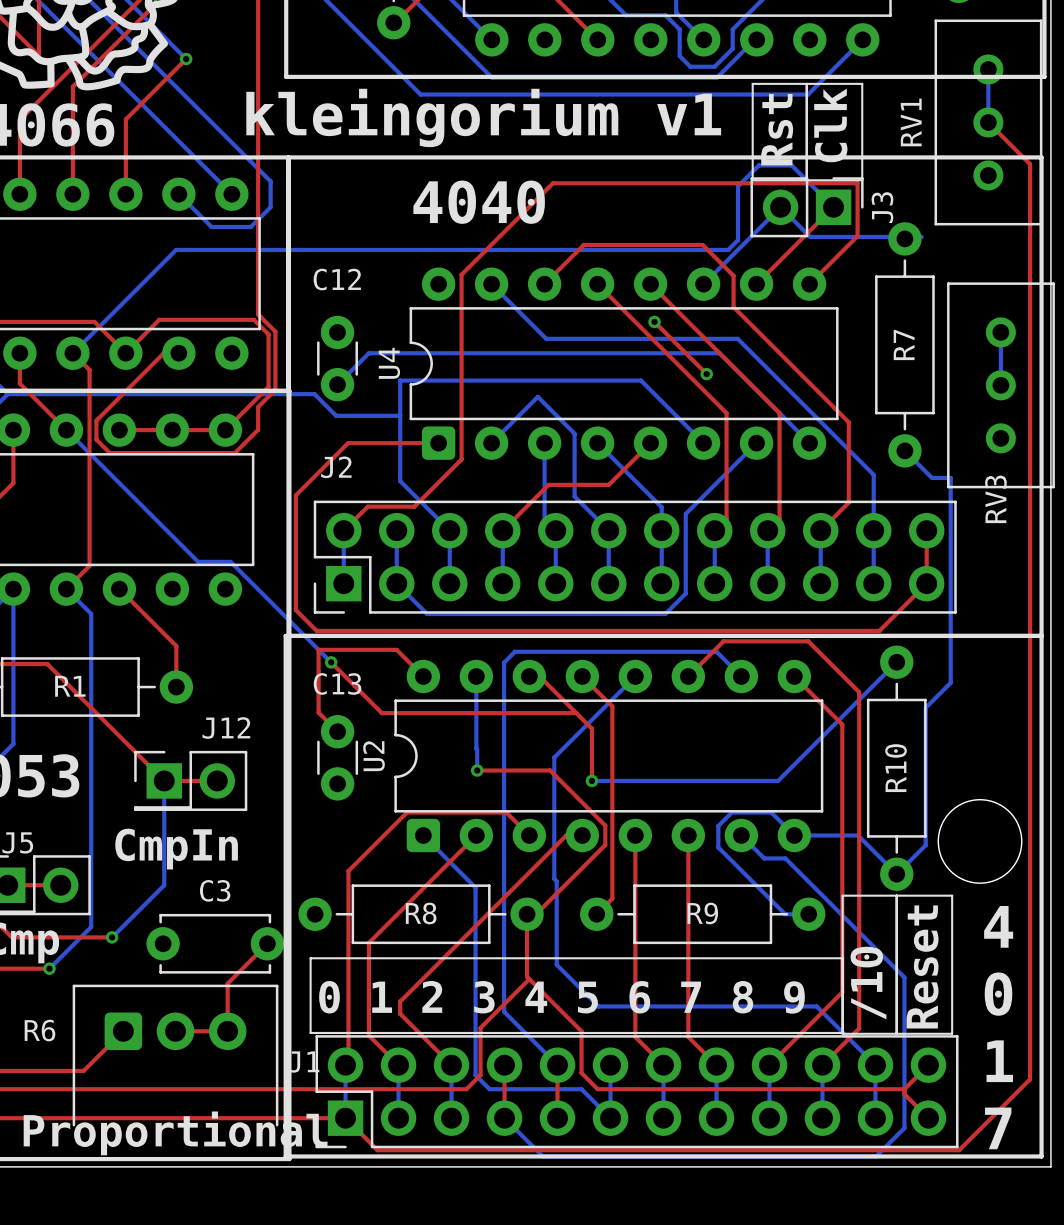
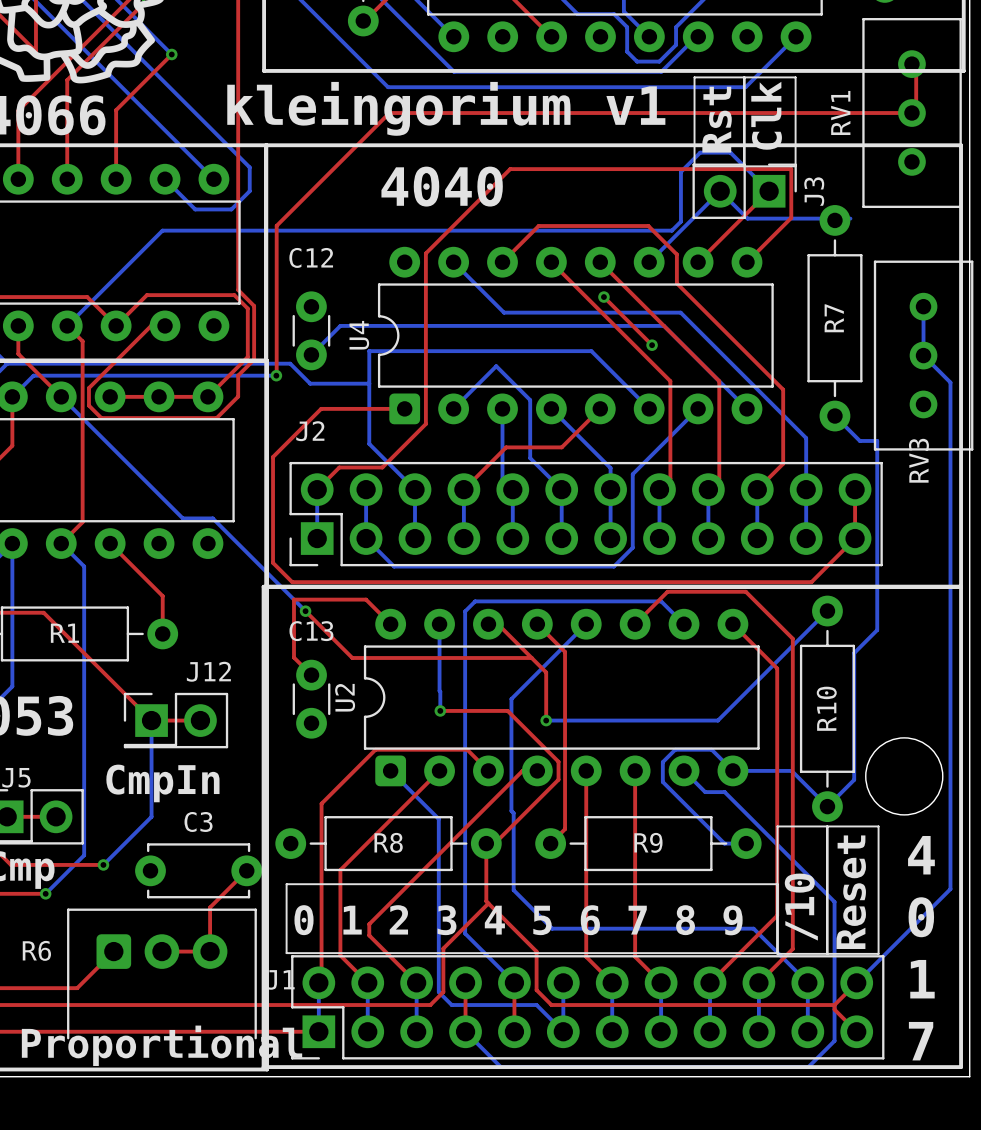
bottom track: (988, 69) (988, 122) -> none
top track: none -> (916, 63) (916, 112)
top track: (988, 122) (1030, 164) (1030, 1079) (959, 1150) (377, 1150) (345, 1118) -> (911, 113) (389, 113) (276, 225) (276, 375)
bottom track: none -> (923, 355) (950, 382) (950, 889) (856, 982)
bottom track: none -> (276, 375) (33, 375) (12, 396)
via: none -> (276, 375)

